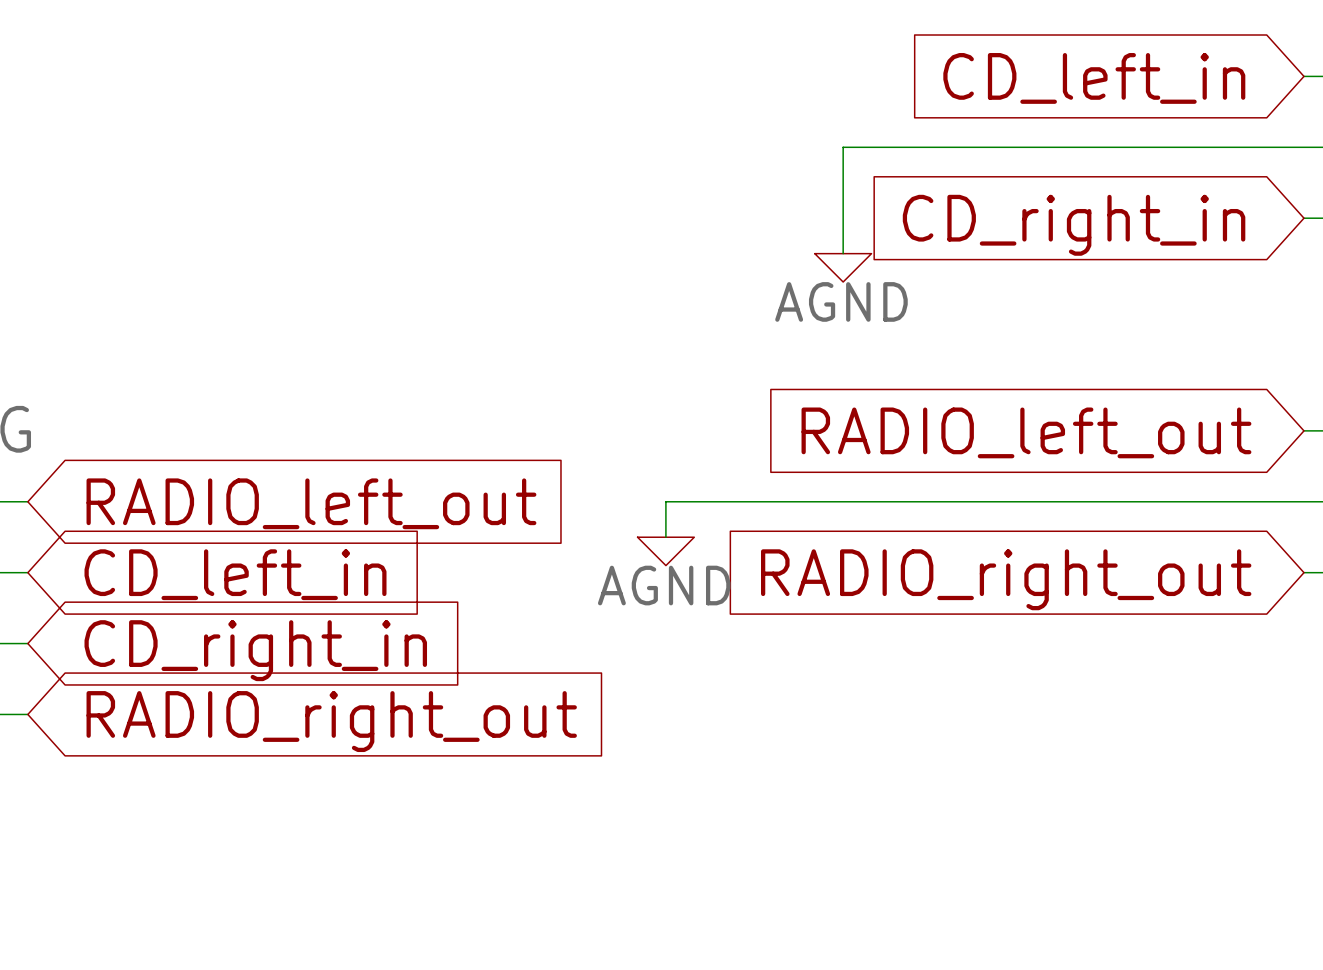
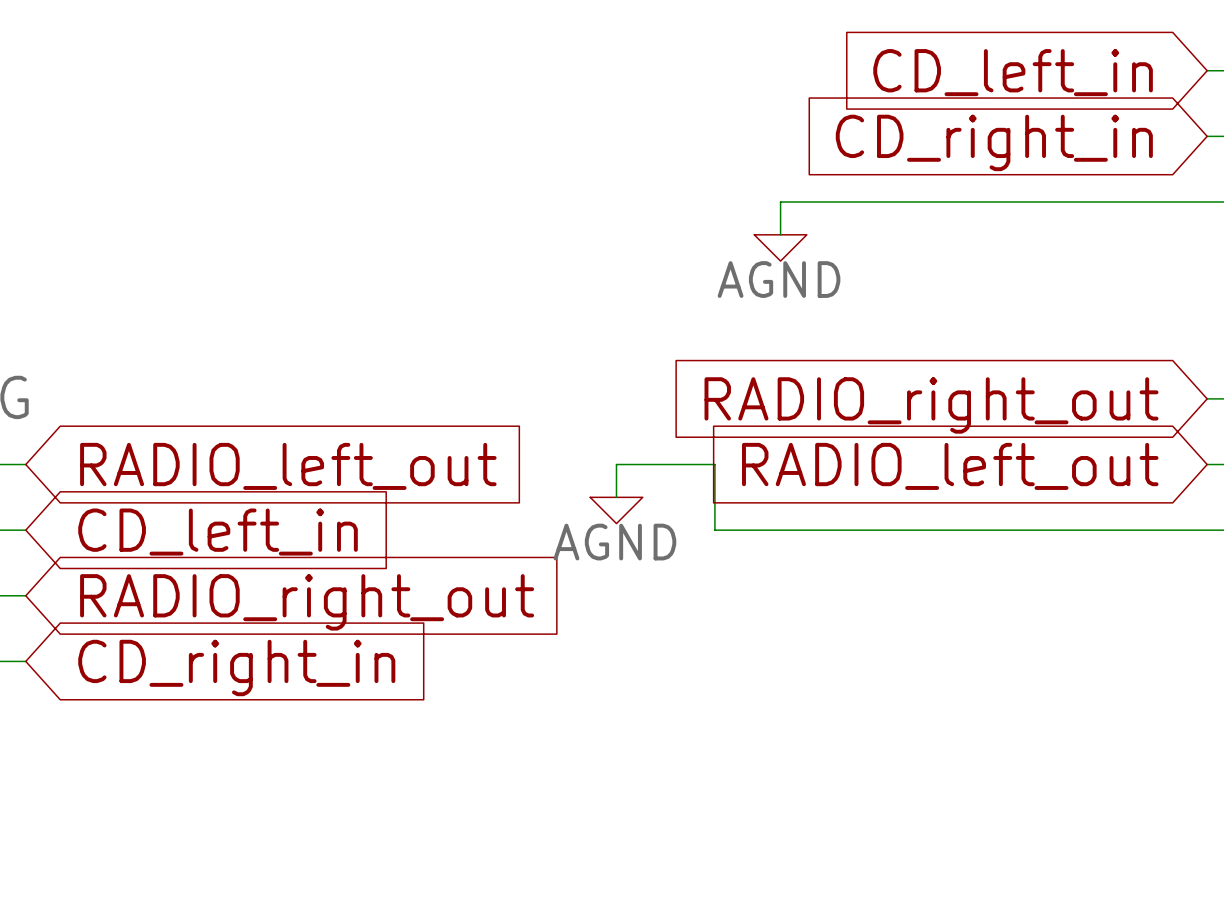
wire: (1303, 147) (843, 147) (843, 218) -> (1207, 202) (780, 202)
global label position: CD_right_in (1074, 225) -> CD_right_in (994, 142)
global label: RADIO_left_out (1026, 432) -> RADIO_right_out (931, 405)
wire: (772, 501) (1303, 501) -> (714, 464) (714, 530) (1207, 530)
global label: RADIO_right_out (1006, 579) -> RADIO_left_out (950, 466)
global label: CD_right_in (255, 650) -> RADIO_right_out (307, 602)
global label: RADIO_right_out (331, 721) -> CD_right_in (236, 667)

